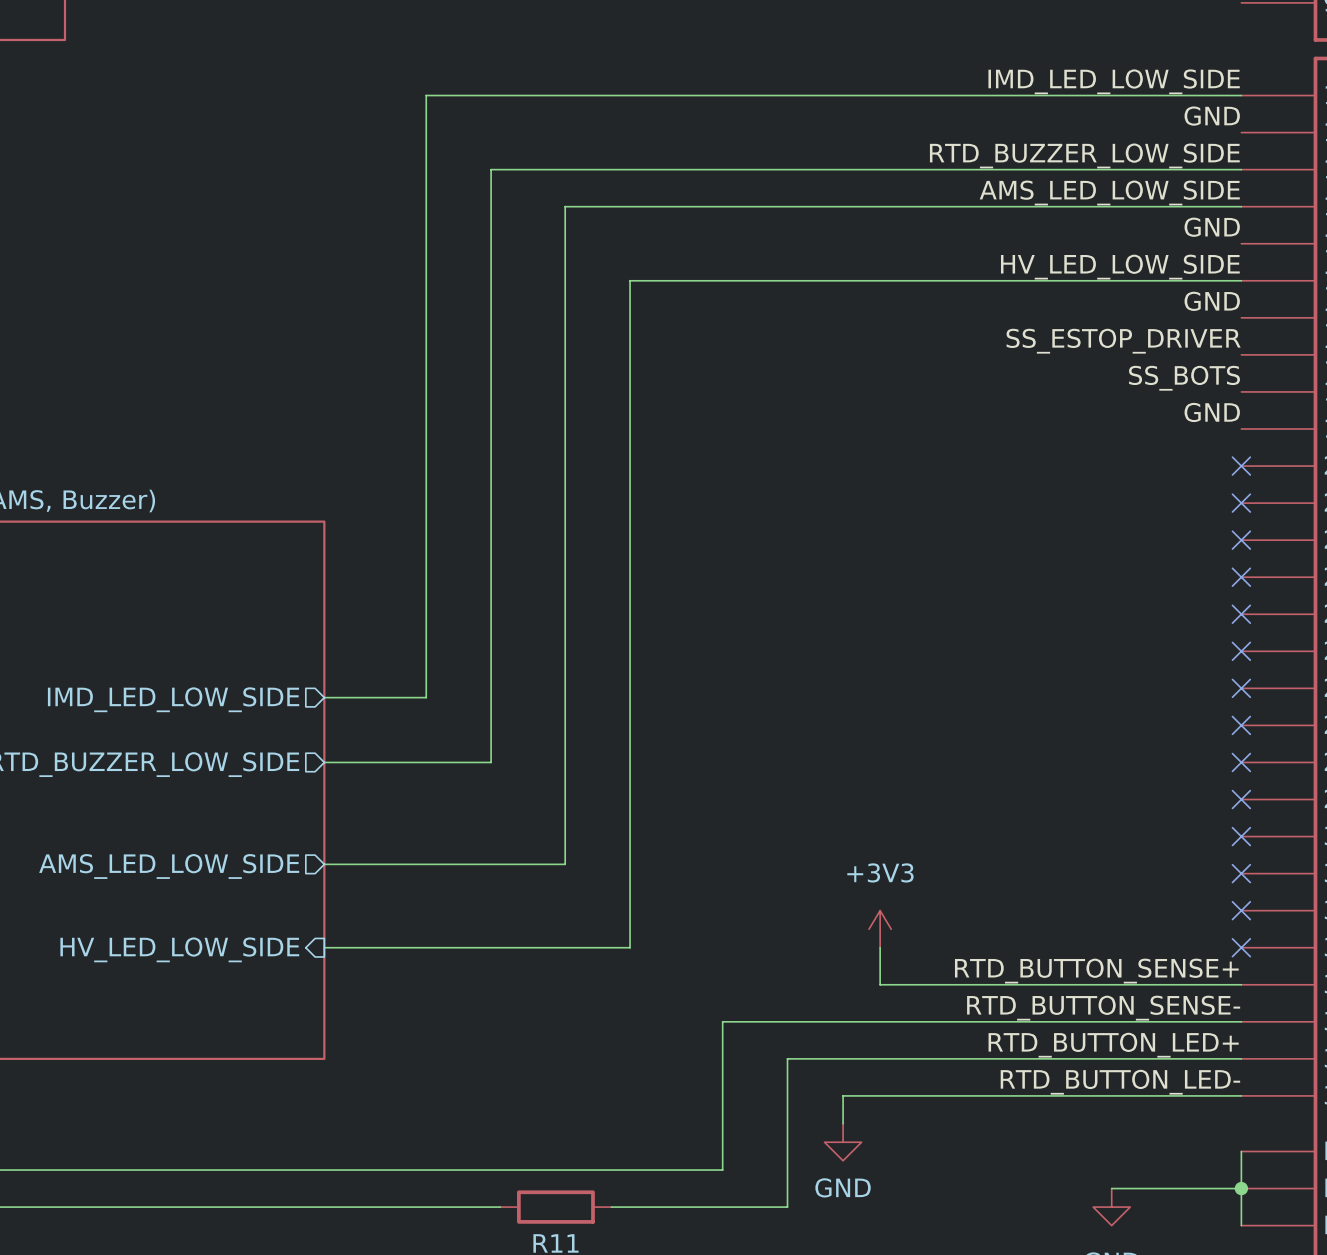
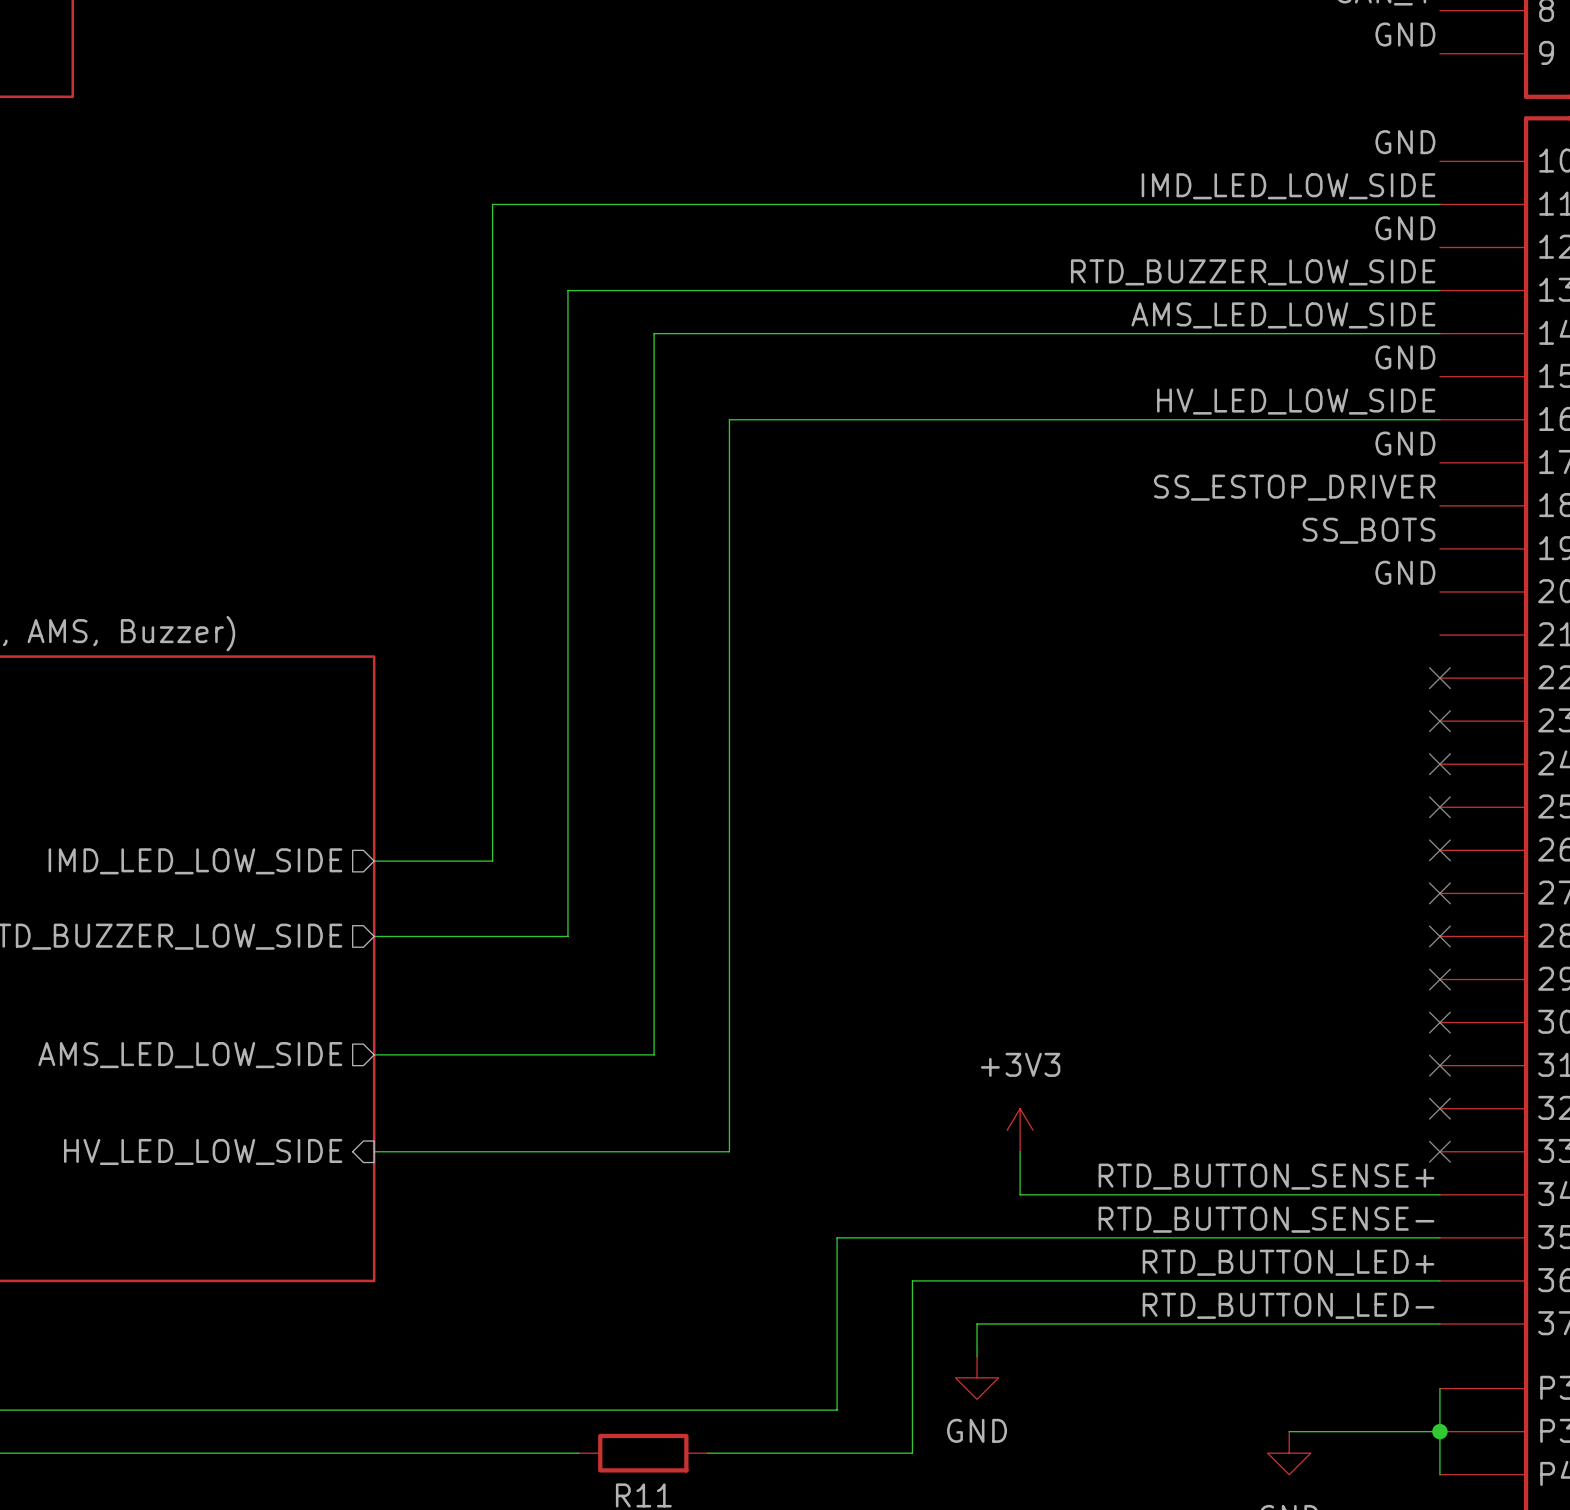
label: IMD_LED_LOW_SIDE (1114, 81) -> GND (1405, 142)
wire: (1241, 95) (426, 95) (426, 132) -> (1439, 204) (492, 204)
label: GND (1212, 116) -> IMD_LED_LOW_SIDE (1288, 186)
label: RTD_BUZZER_LOW_SIDE (1084, 155) -> GND (1405, 228)
wire: (1241, 169) (491, 169) (491, 206) -> none
label: AMS_LED_LOW_SIDE (1109, 192) -> RTD_BUZZER_LOW_SIDE (1253, 272)
wire: (565, 206) (565, 243) -> (654, 290) (567, 290)
label: GND (1212, 227) -> AMS_LED_LOW_SIDE (1283, 315)
wire: none -> (654, 333) (1439, 333)
label: HV_LED_LOW_SIDE (1120, 267) -> GND (1405, 357)
wire: (1241, 280) (630, 280) (630, 317) -> (1439, 419) (729, 419)
label: GND (1212, 301) -> HV_LED_LOW_SIDE (1296, 401)
label: SS_ESTOP_DRIVER (1123, 341) -> GND (1405, 443)
label: SS_BOTS (1184, 378) -> SS_ESTOP_DRIVER (1294, 487)
label: GND (1212, 412) -> SS_BOTS (1369, 530)
label: none -> GND (1405, 572)
no-connect mark: (1241, 466) -> none
no-connect mark: (1241, 503) -> none

